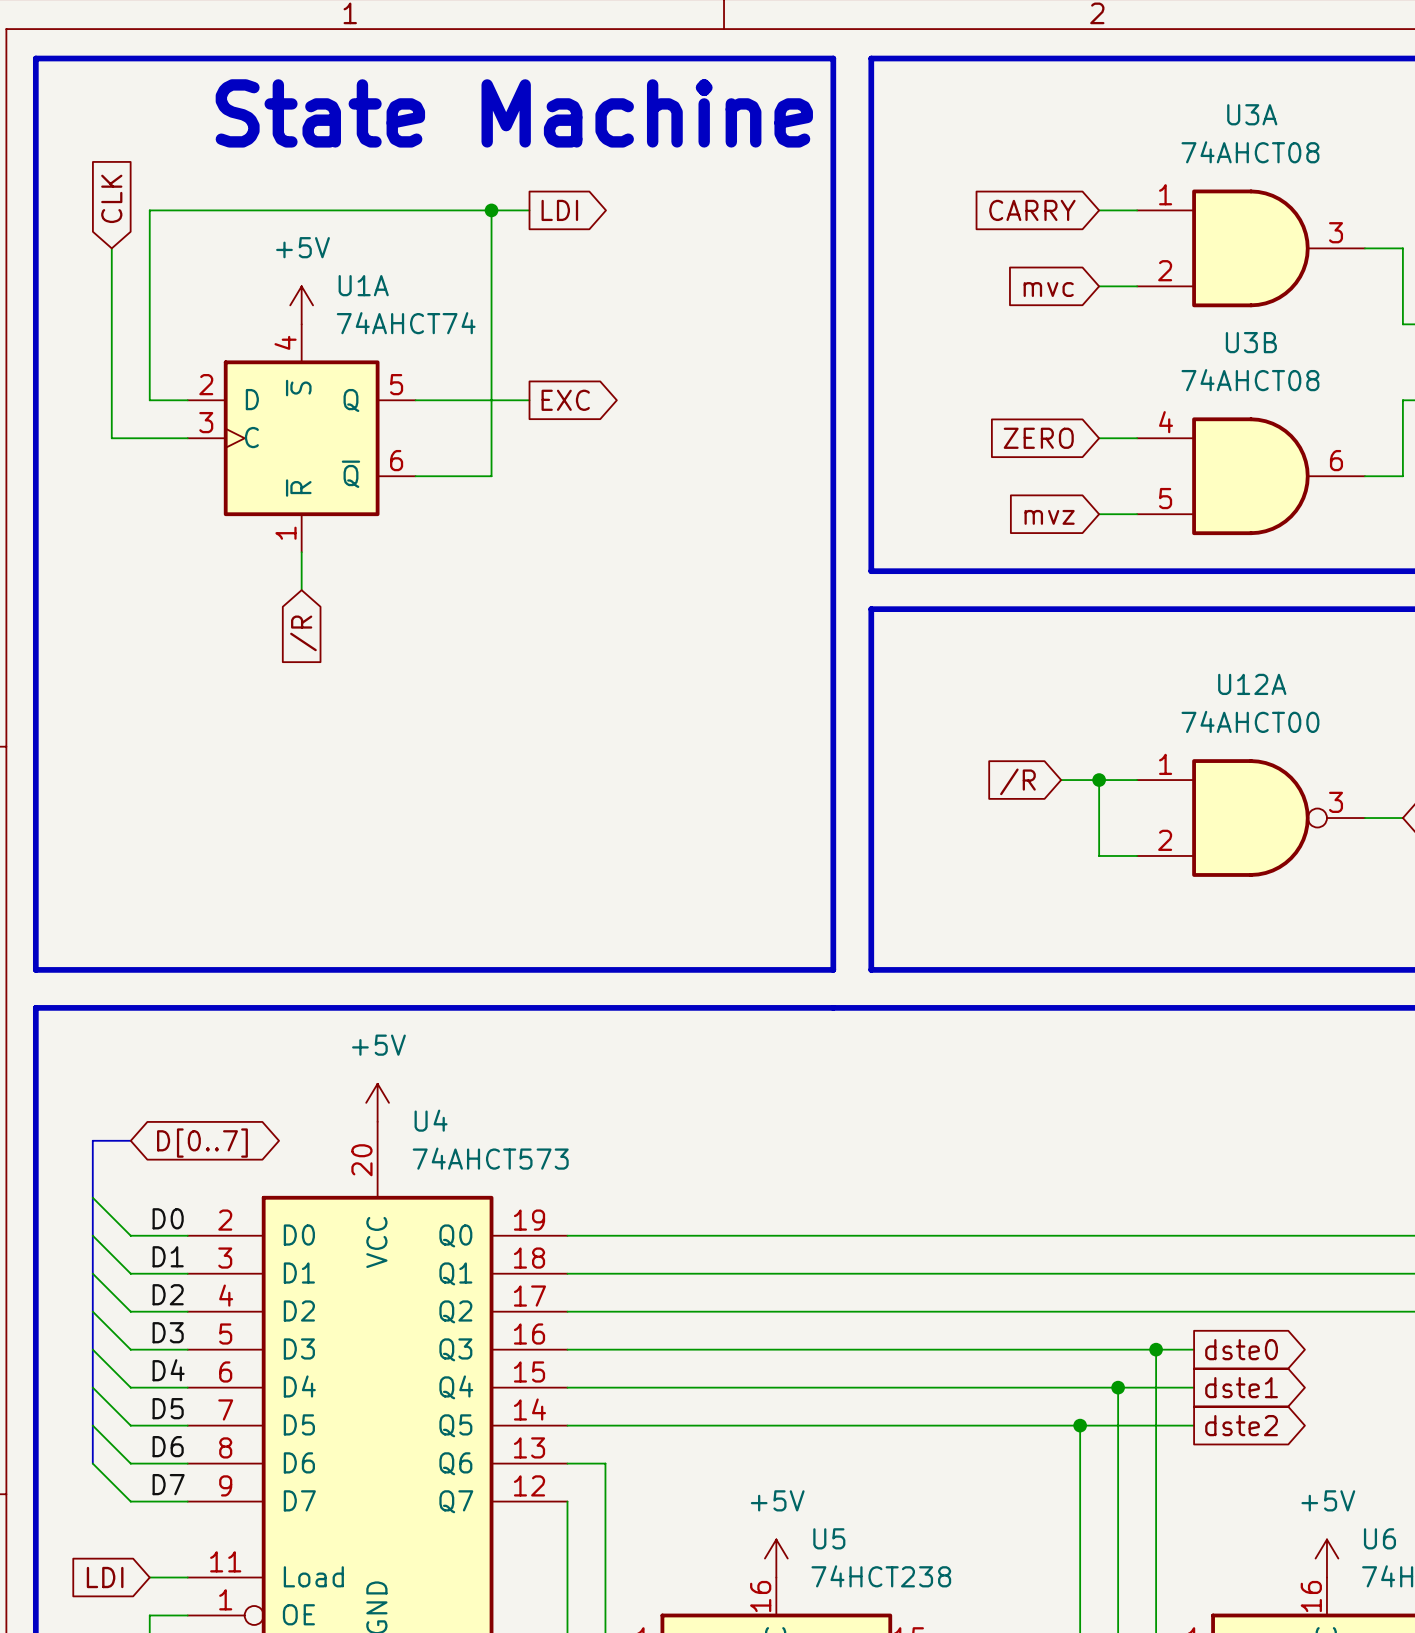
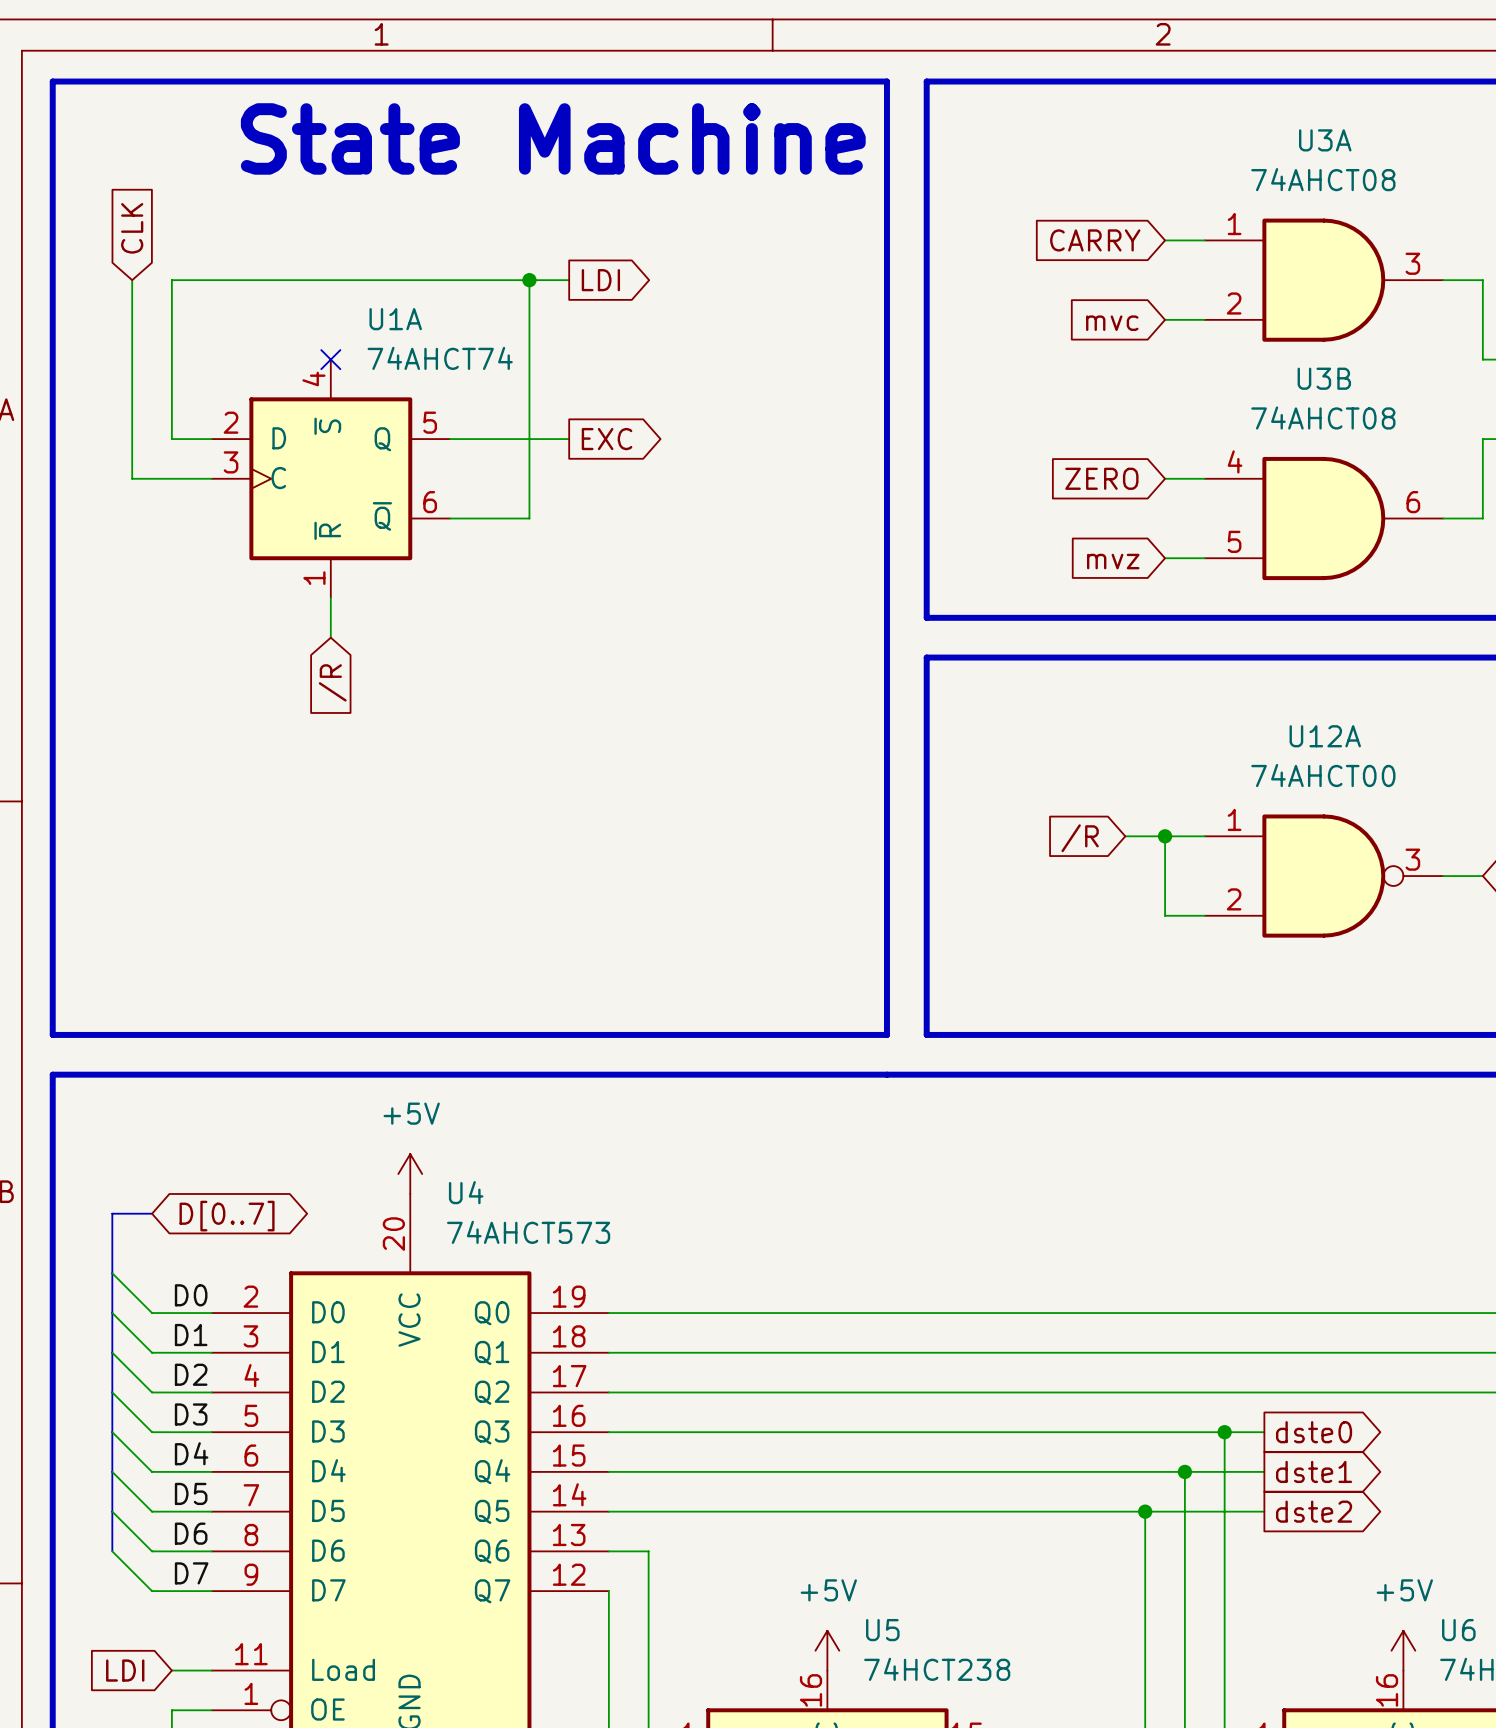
wire: (491, 210) (491, 248) -> none
junction position: (491, 210) -> (529, 280)
wire: (529, 210) (149, 210) (149, 248) -> (569, 280) (171, 280)
global label position: LDI (559, 210) -> LDI (600, 280)
power symbol: +5V (301, 305) -> none
no-connect mark: none -> (330, 359)

